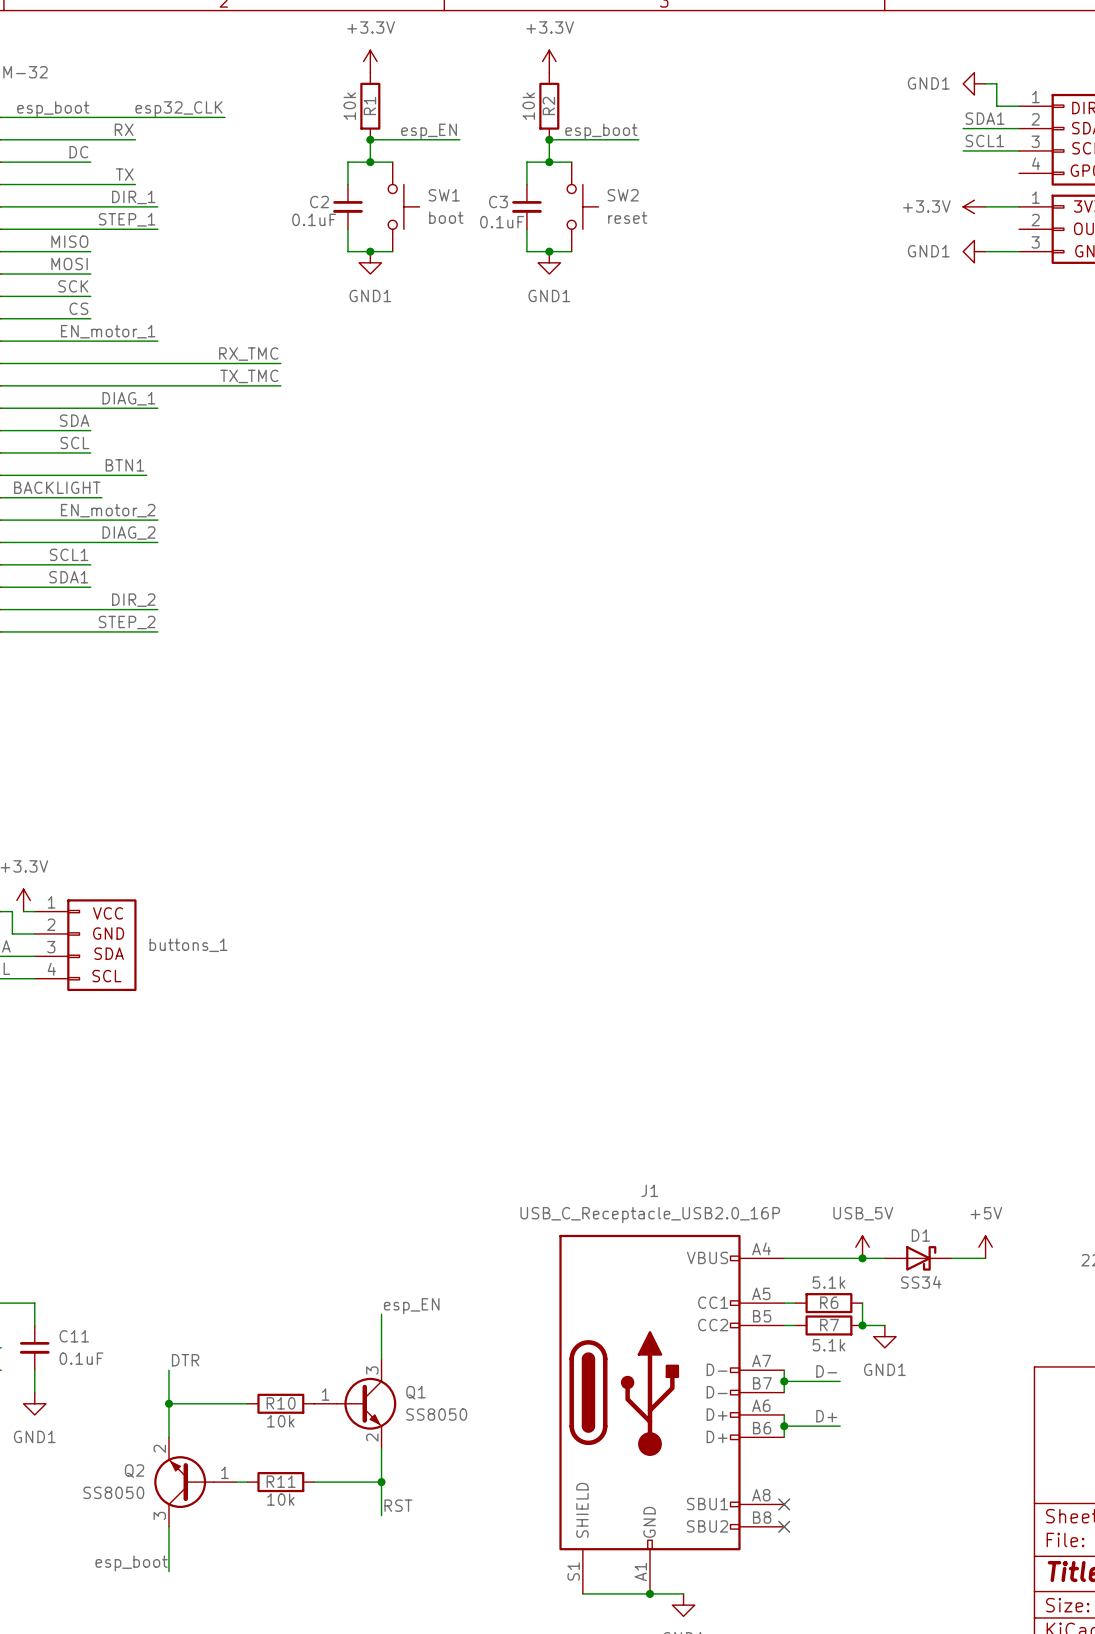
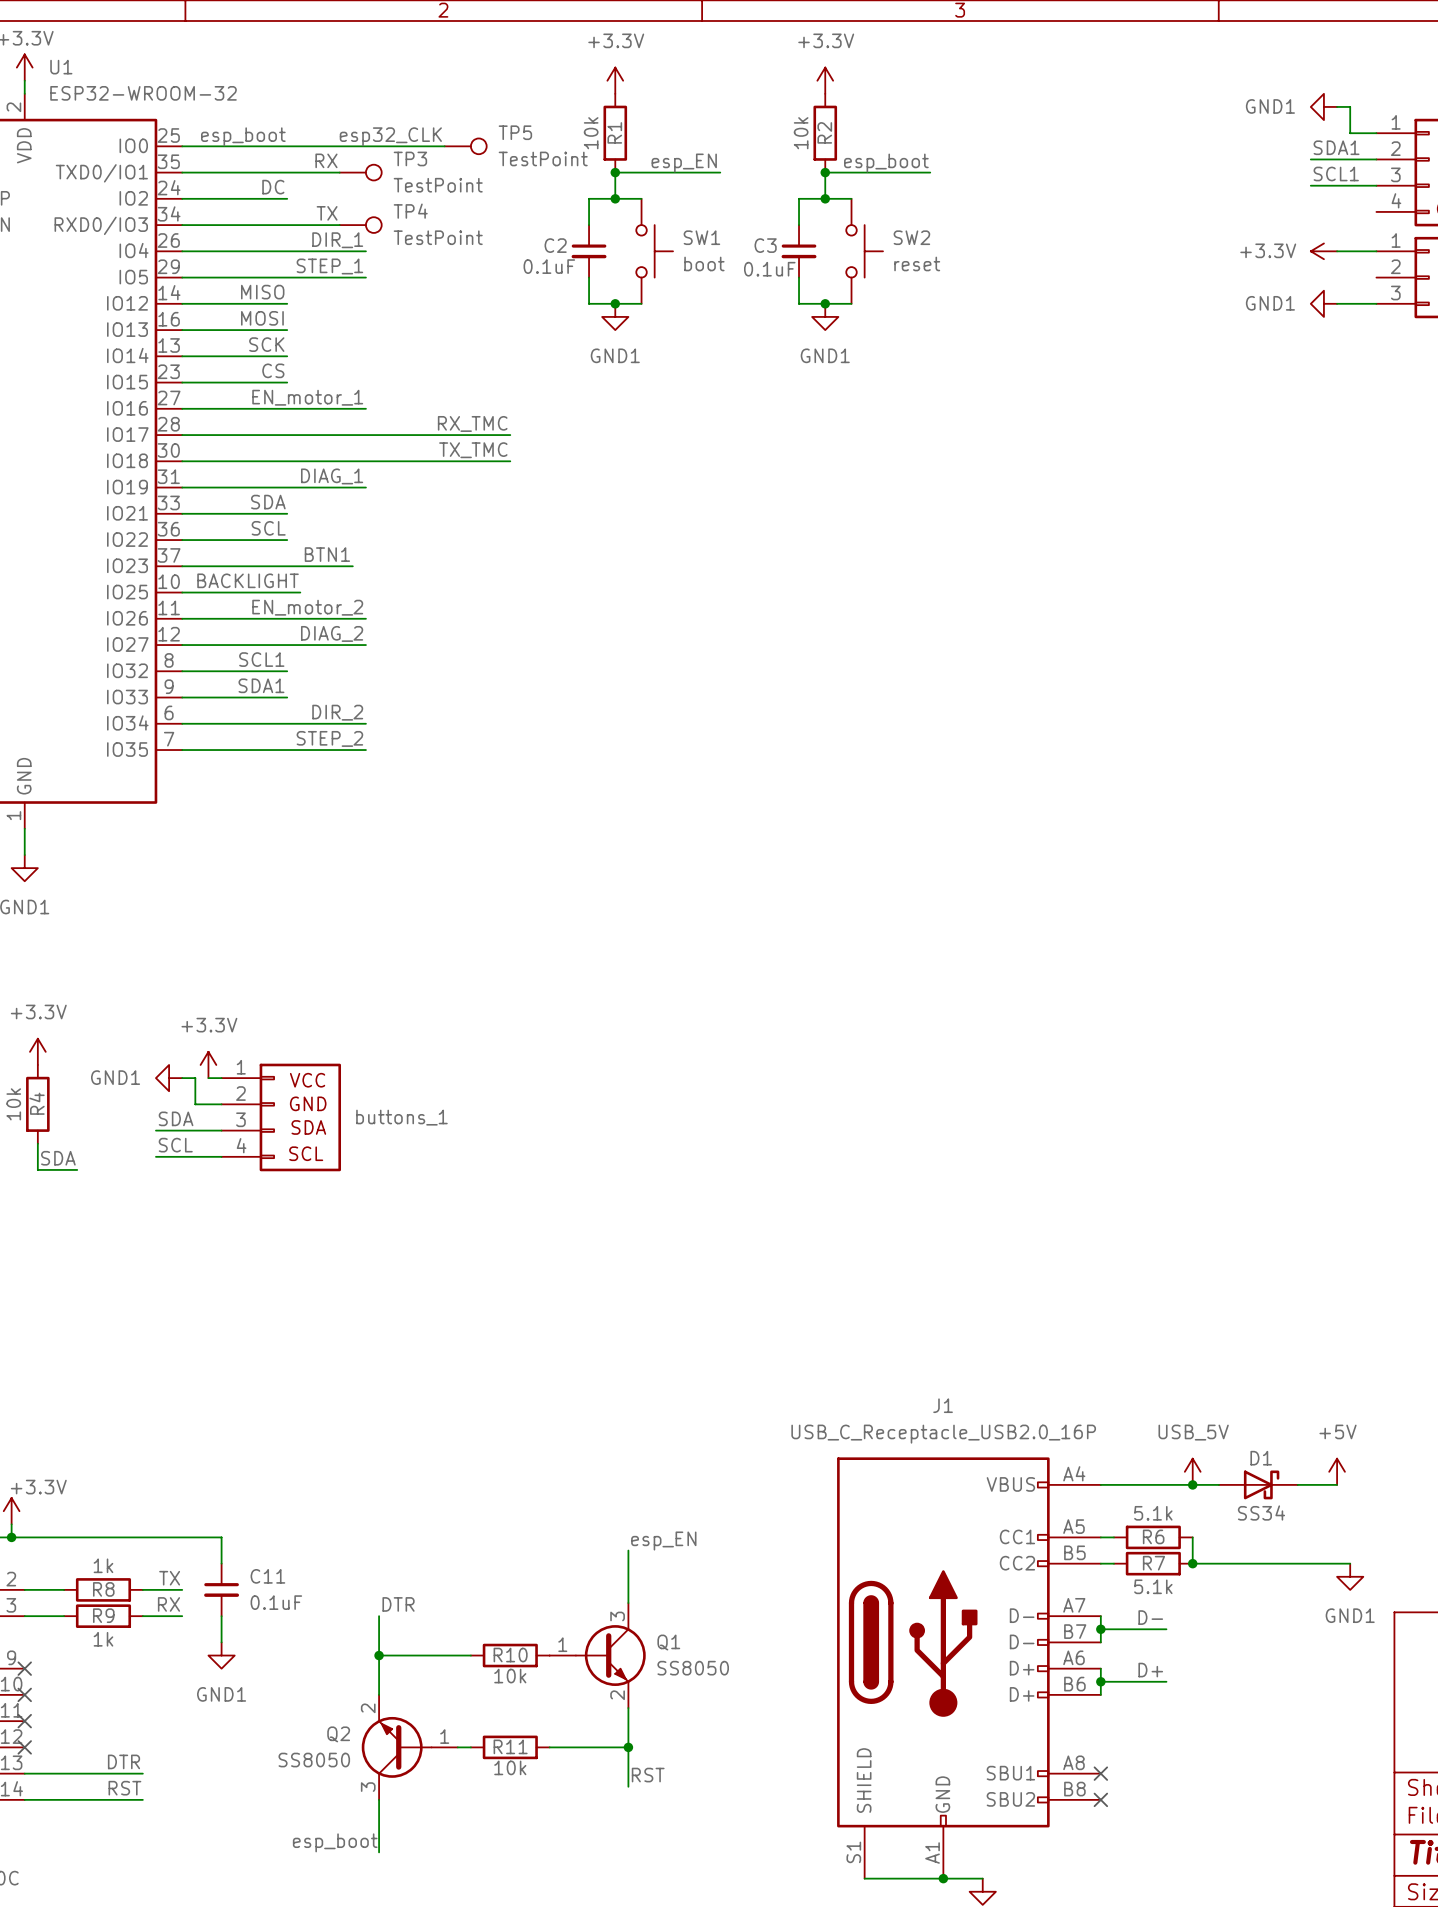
TP5: none -> TestPoint (465, 146)
TP3: none -> TestPoint (360, 172)
TP4: none -> TestPoint (360, 225)
wire: none -> (1218, 1563) (1350, 1563)
power symbol position: GND1 (884, 1336) -> GND1 (1350, 1576)

